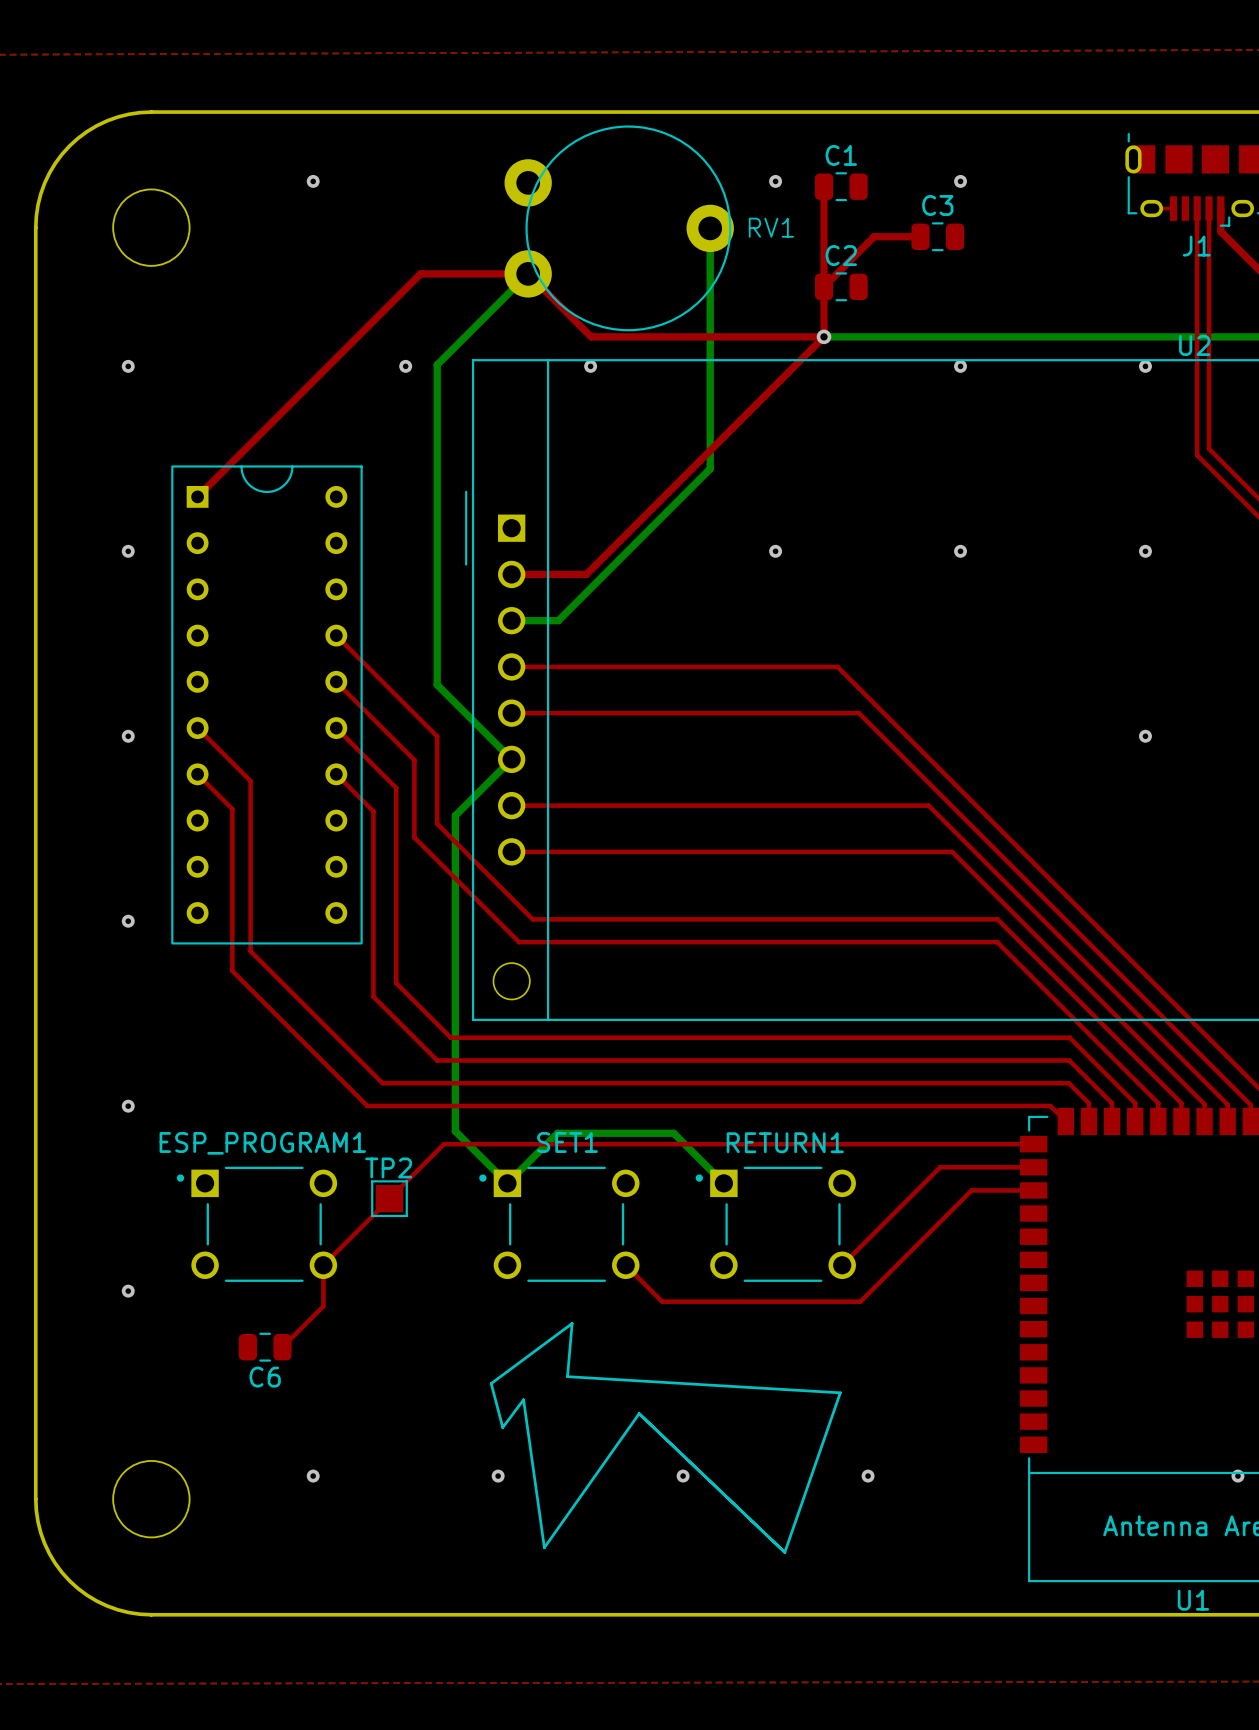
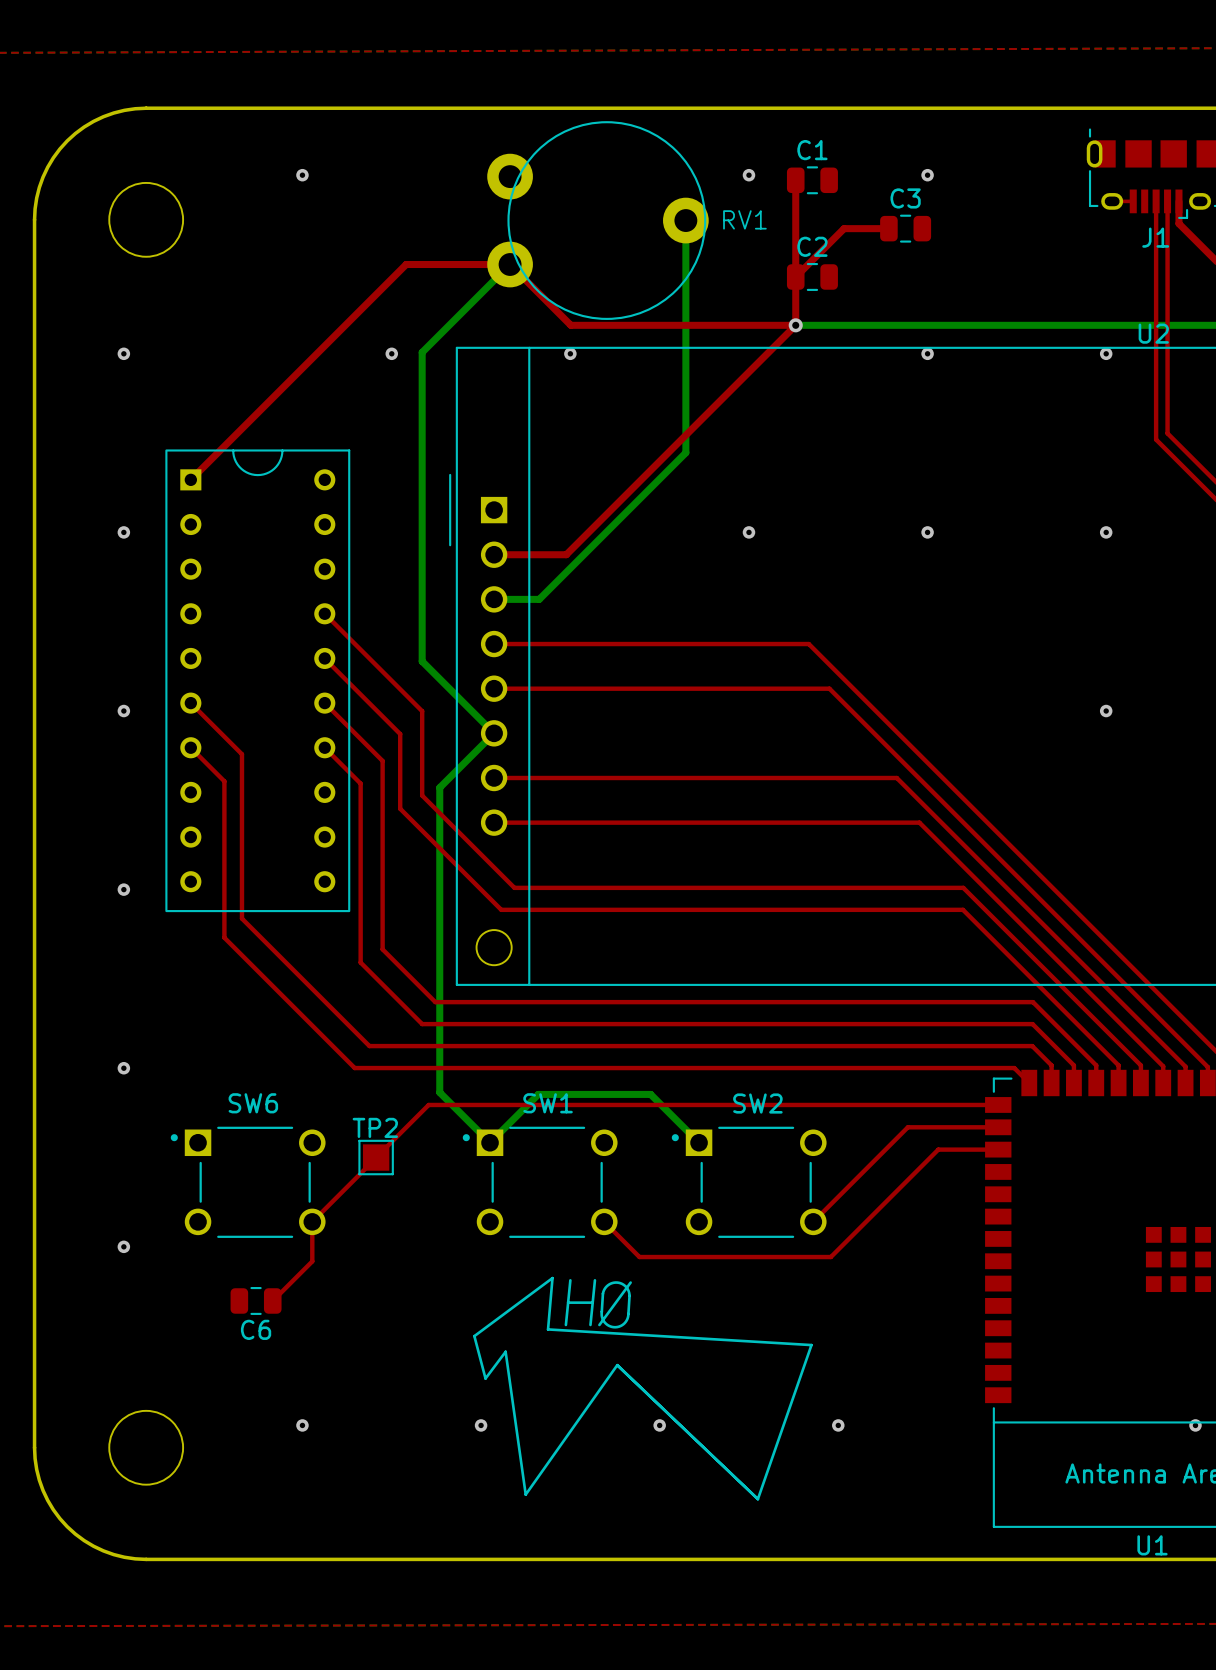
SET1 name: SET1 (567, 1142) -> SW1 (548, 1103)
RETURN1 name: RETURN1 (785, 1142) -> SW2 (757, 1103)
ESP_PROGRAM1 name: ESP_PROGRAM1 (262, 1143) -> SW6 (253, 1103)
line: none -> (570, 1280) (565, 1324)
line: none -> (594, 1280) (590, 1324)
line: none -> (630, 1282) (599, 1324)
line: none -> (602, 1293) (601, 1315) (603, 1321) (612, 1326) (622, 1325) (628, 1315) (629, 1295) (627, 1289) (622, 1283) (613, 1282) (606, 1286) (602, 1293)
line: none -> (568, 1302) (592, 1302)

